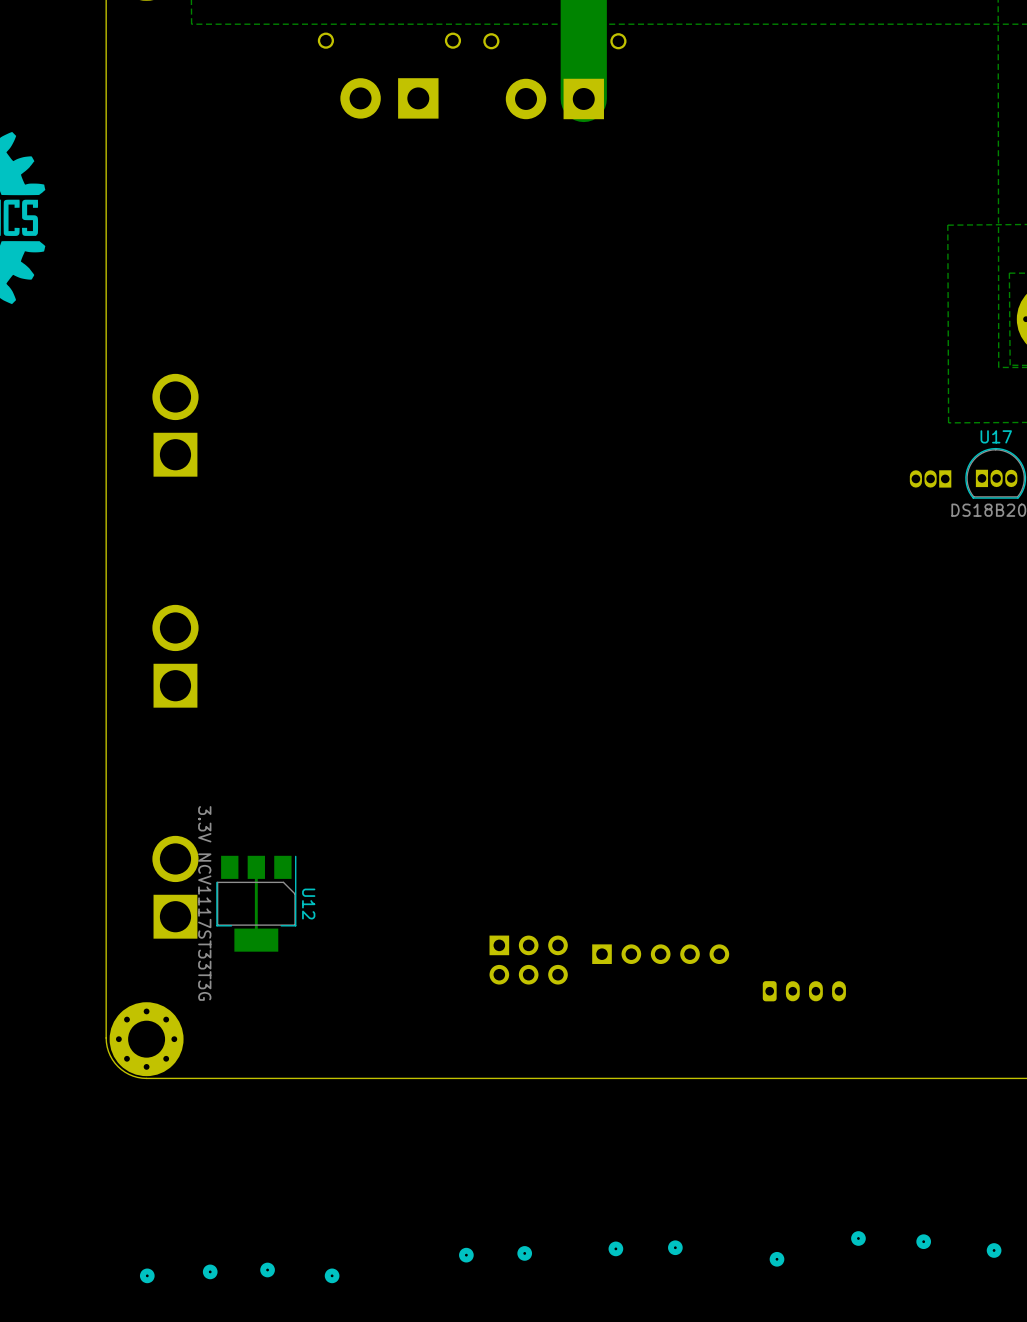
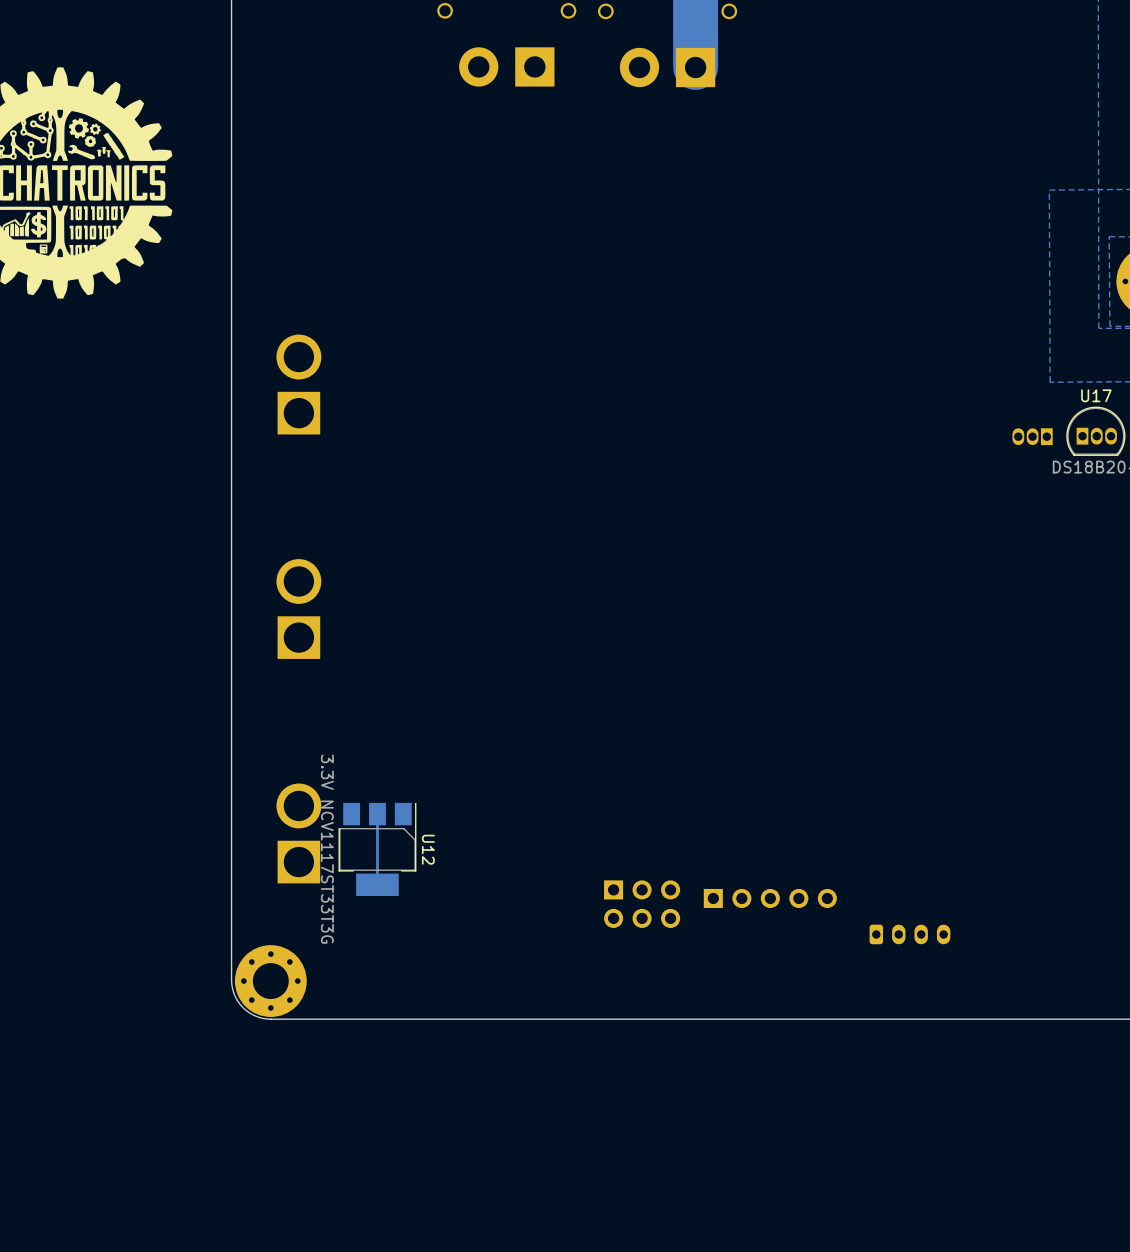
part: (858, 1238) -> none
part: (923, 1241) -> none
part: (675, 1247) -> none
part: (615, 1248) -> none
part: (994, 1250) -> none
part: (524, 1253) -> none
part: (466, 1255) -> none
part: (777, 1259) -> none
part: (267, 1269) -> none
part: (210, 1271) -> none
part: (147, 1275) -> none
part: (332, 1275) -> none

